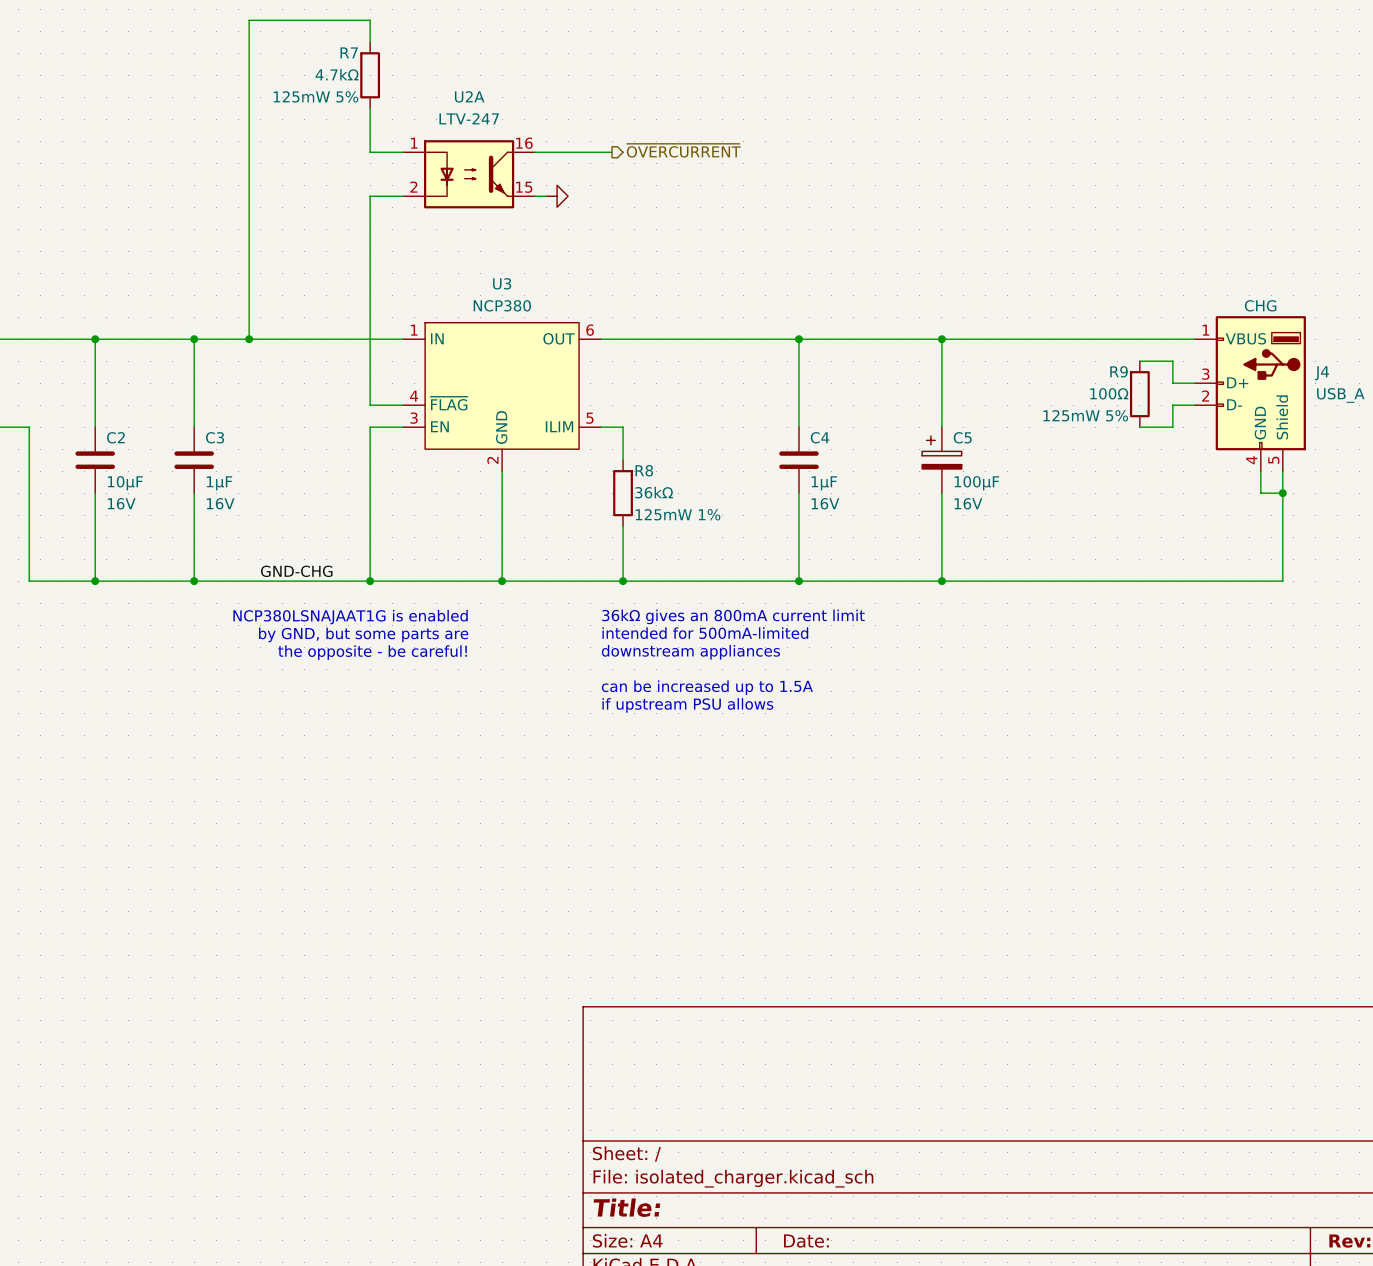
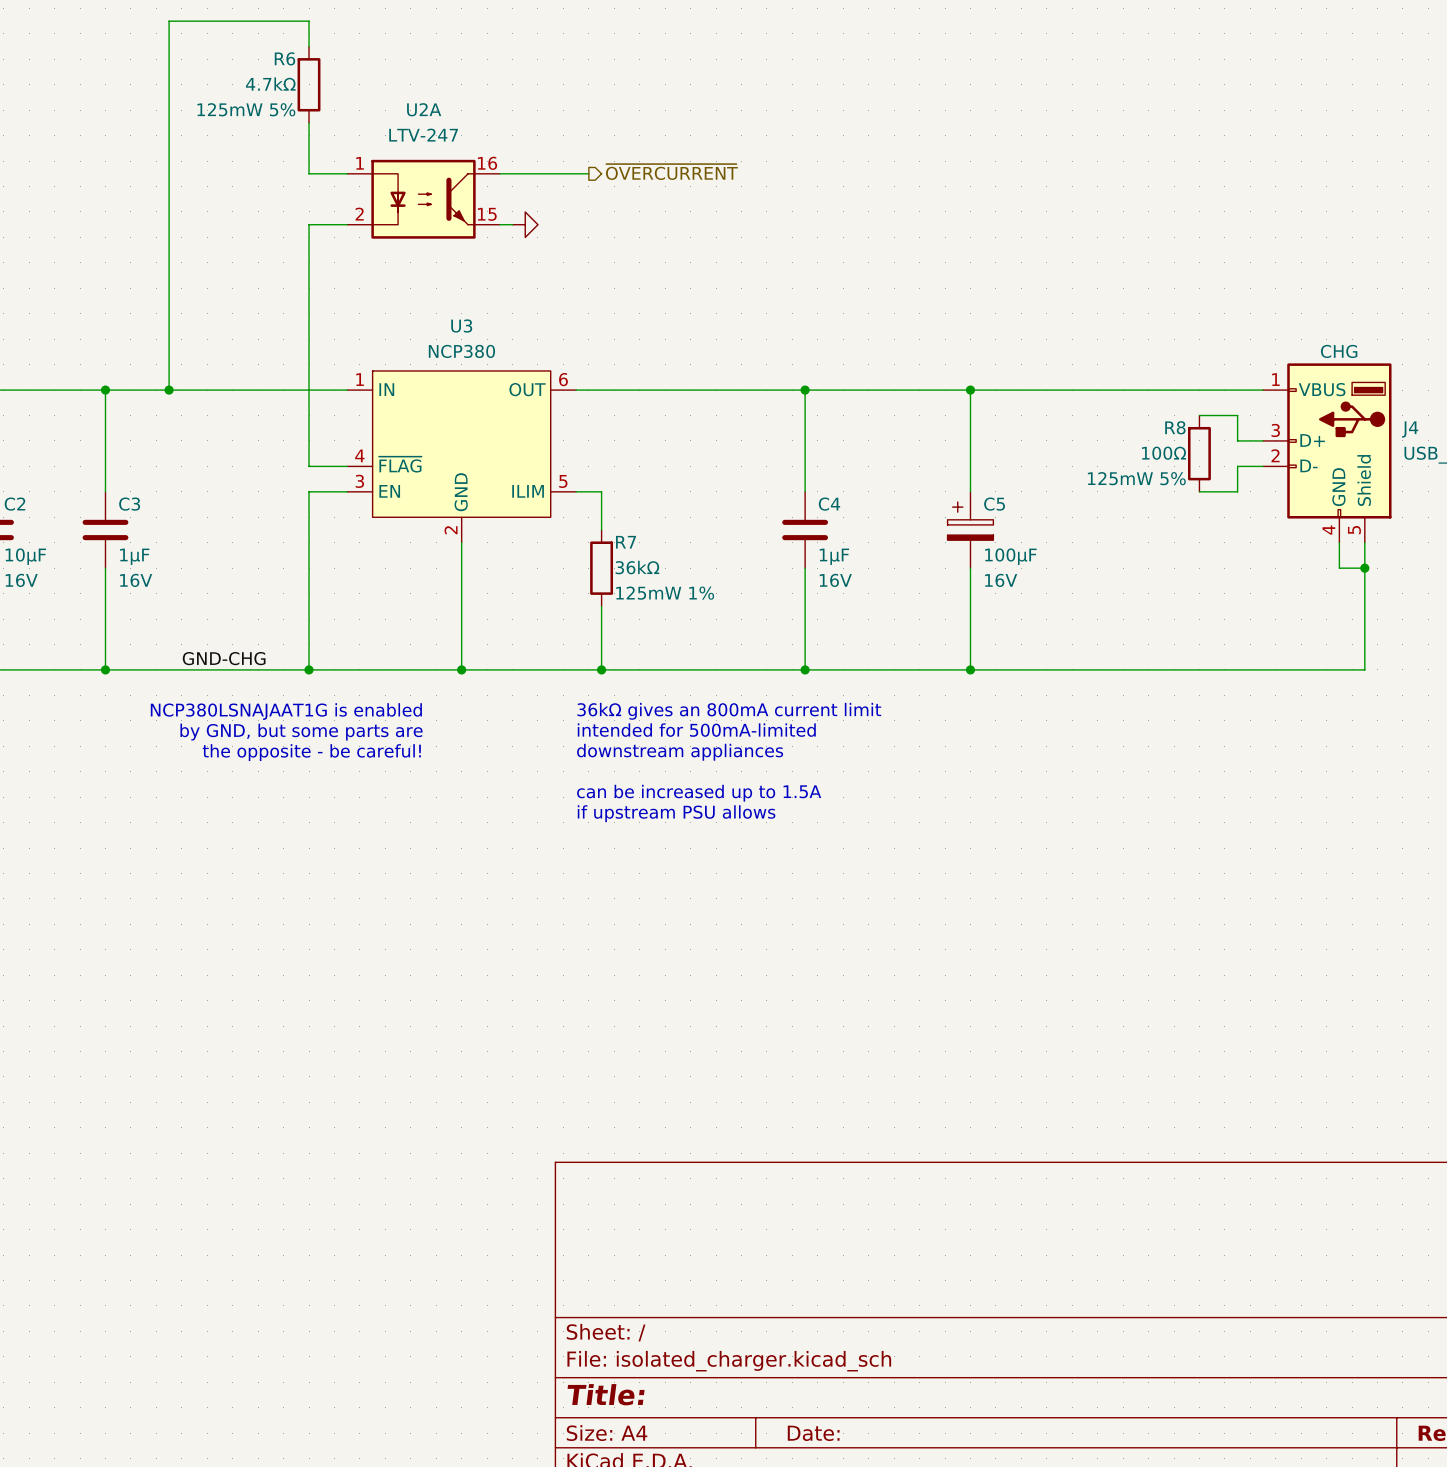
R7 name: R7 (349, 52) -> R6 (284, 58)
R9 name: R9 (1119, 371) -> R8 (1175, 427)
R8 name: R8 (644, 470) -> R7 (626, 542)

